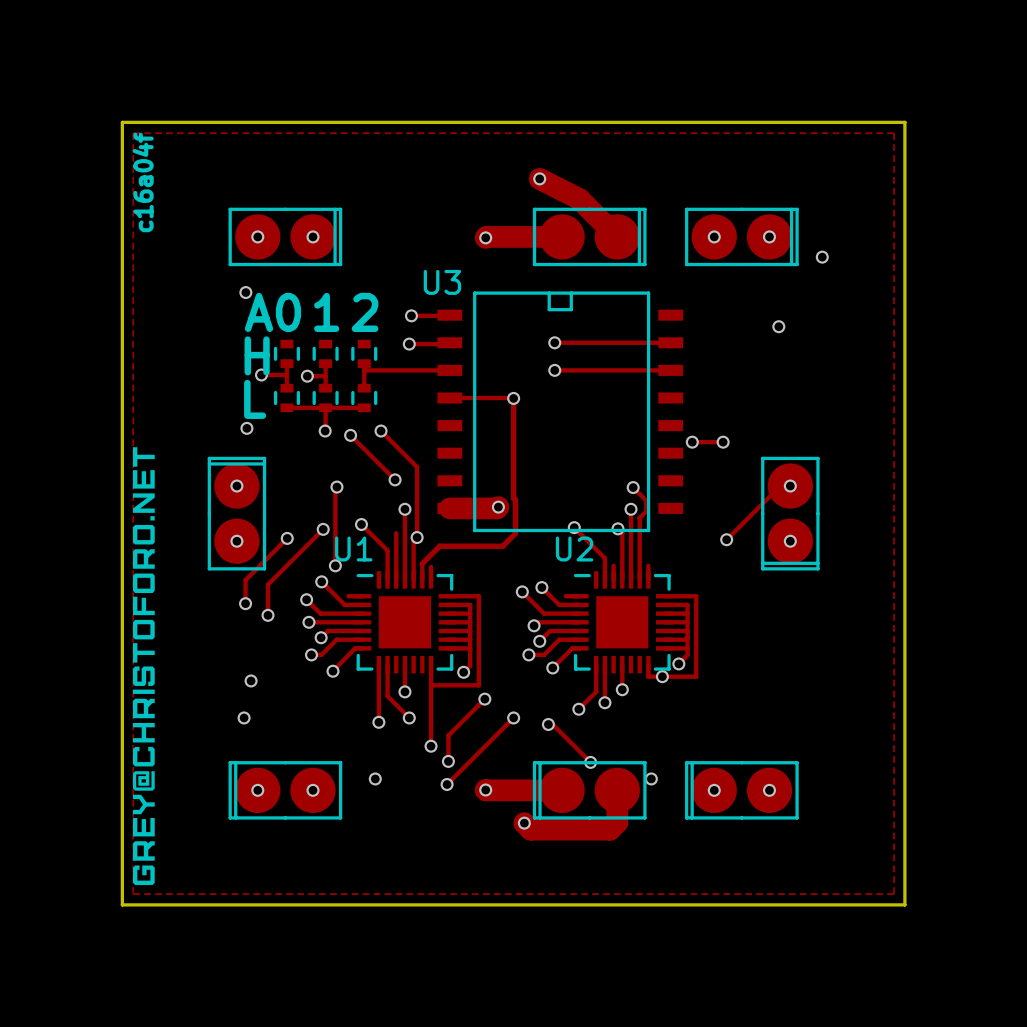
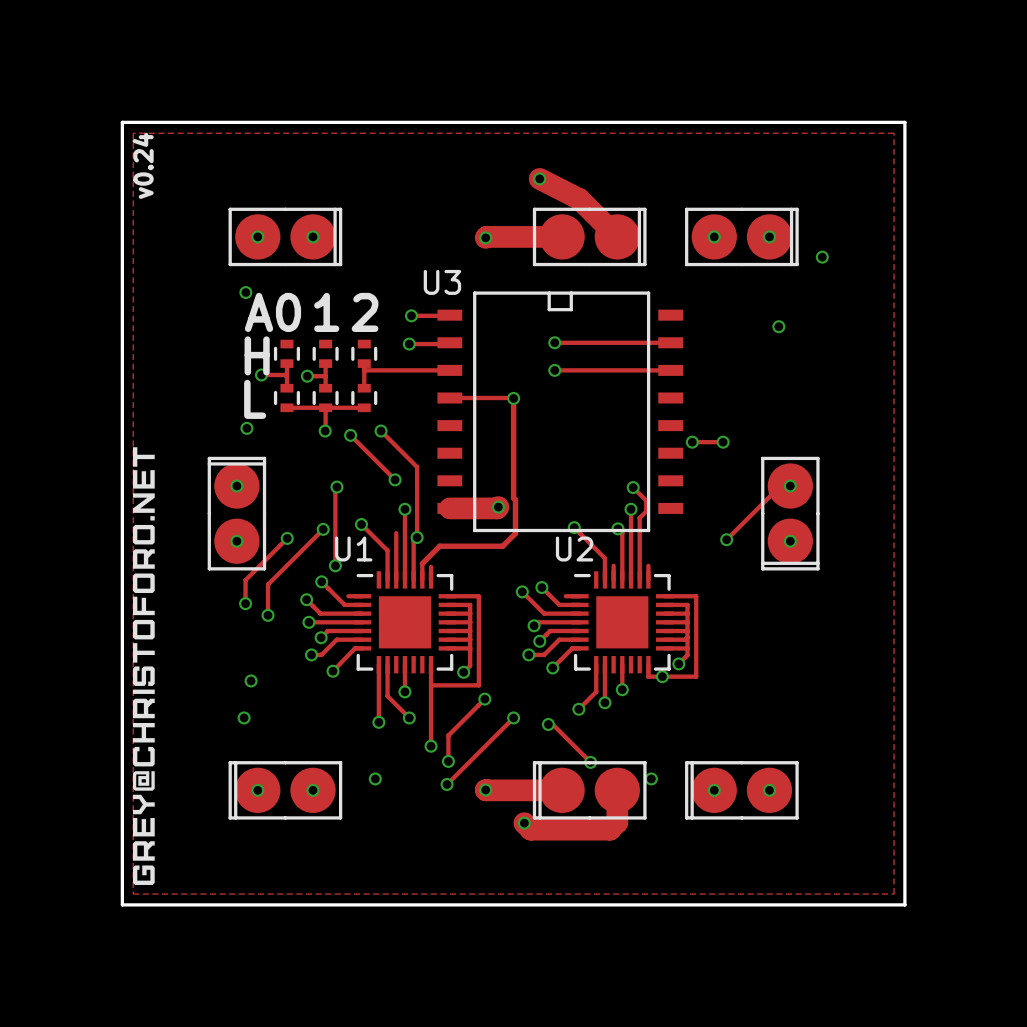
text: c16a04f (143, 182) -> v0.24 (143, 165)

